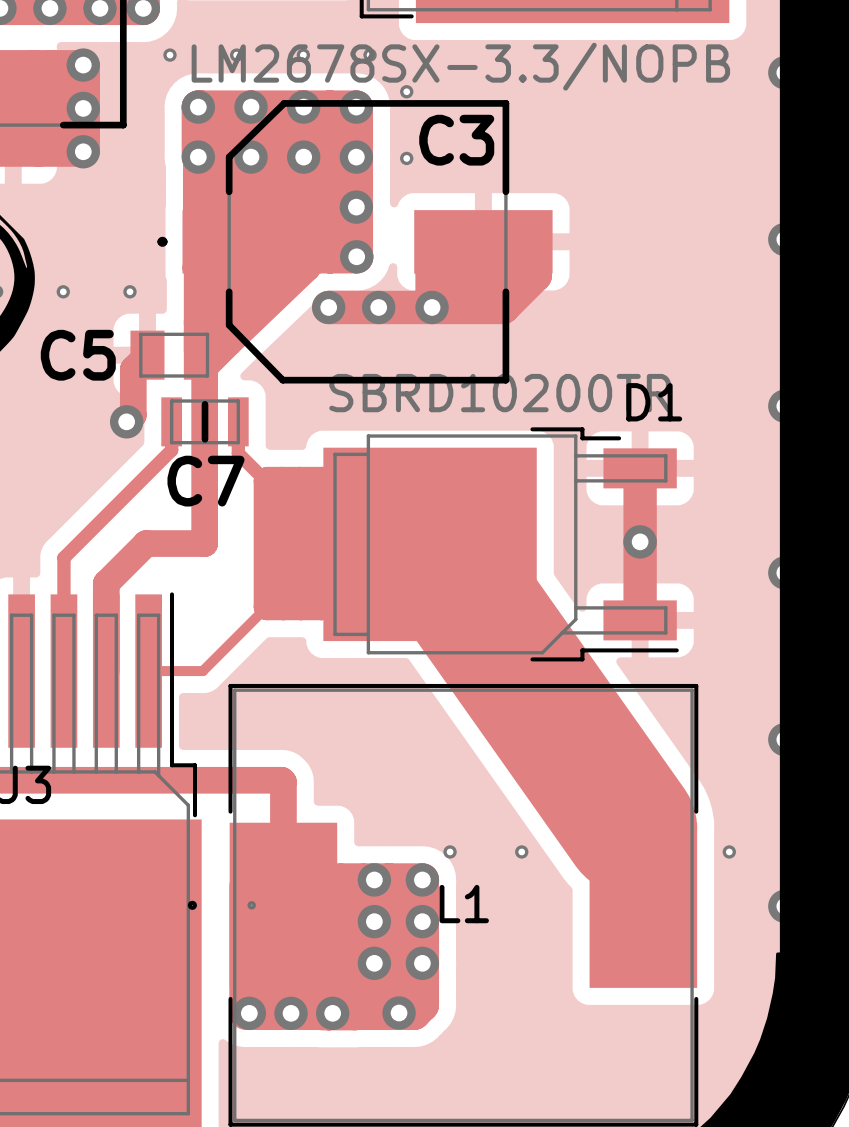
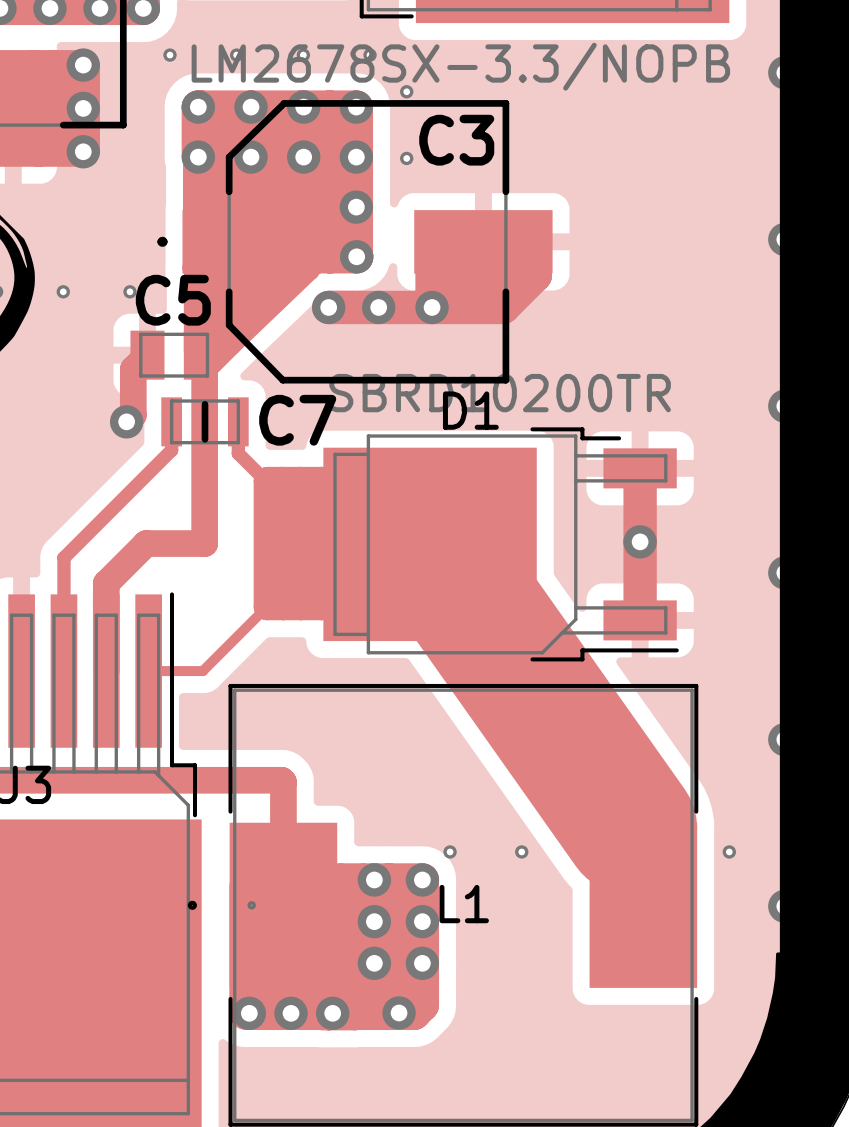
C5 name position: C5 (78, 355) -> C5 (173, 300)
D1 name position: D1 (654, 402) -> D1 (470, 410)
C7 name position: C7 (206, 481) -> C7 (297, 420)

